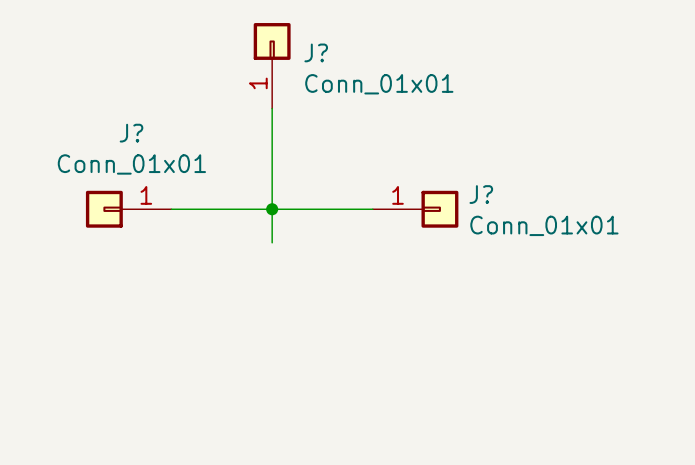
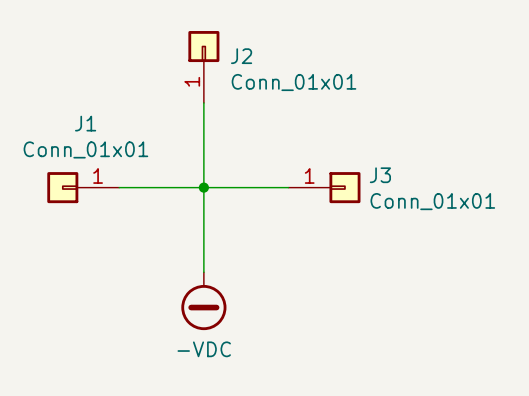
J? name: J? (316, 52) -> J2 (241, 56)
J? name: J? (131, 133) -> J1 (85, 123)
J? name: J? (481, 194) -> J3 (380, 175)
wire: none -> (203, 215) (203, 272)
power symbol: none -> -VDC (203, 301)

